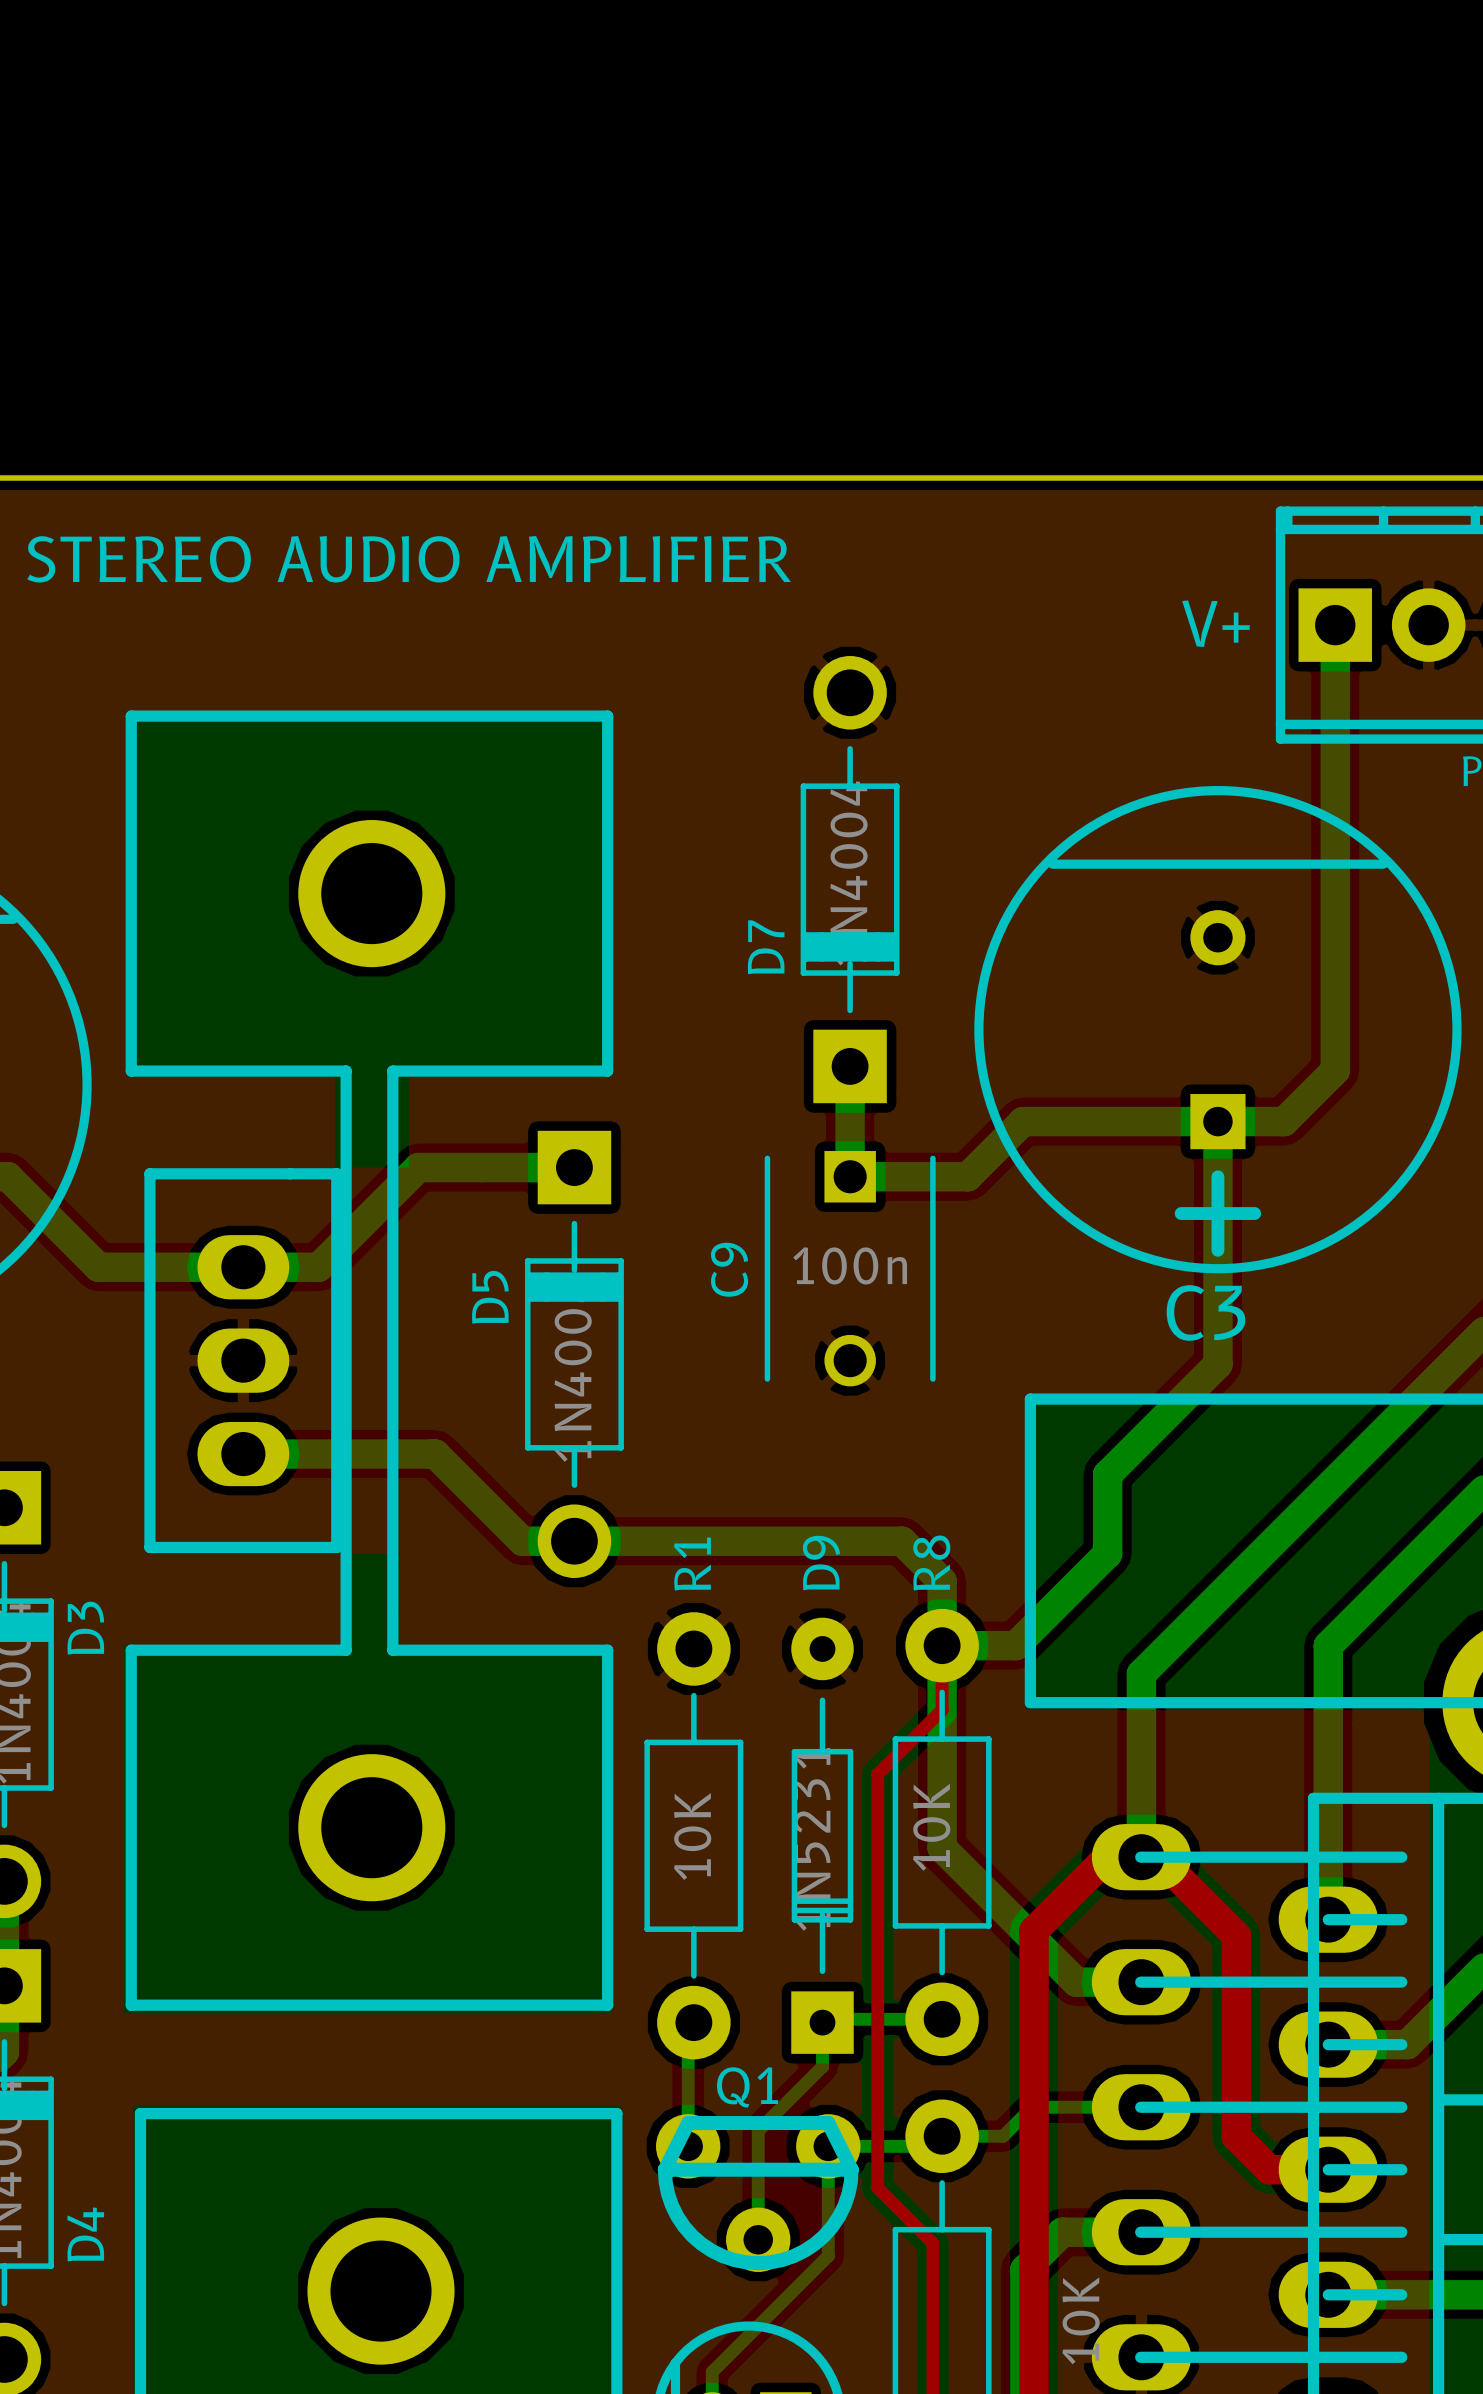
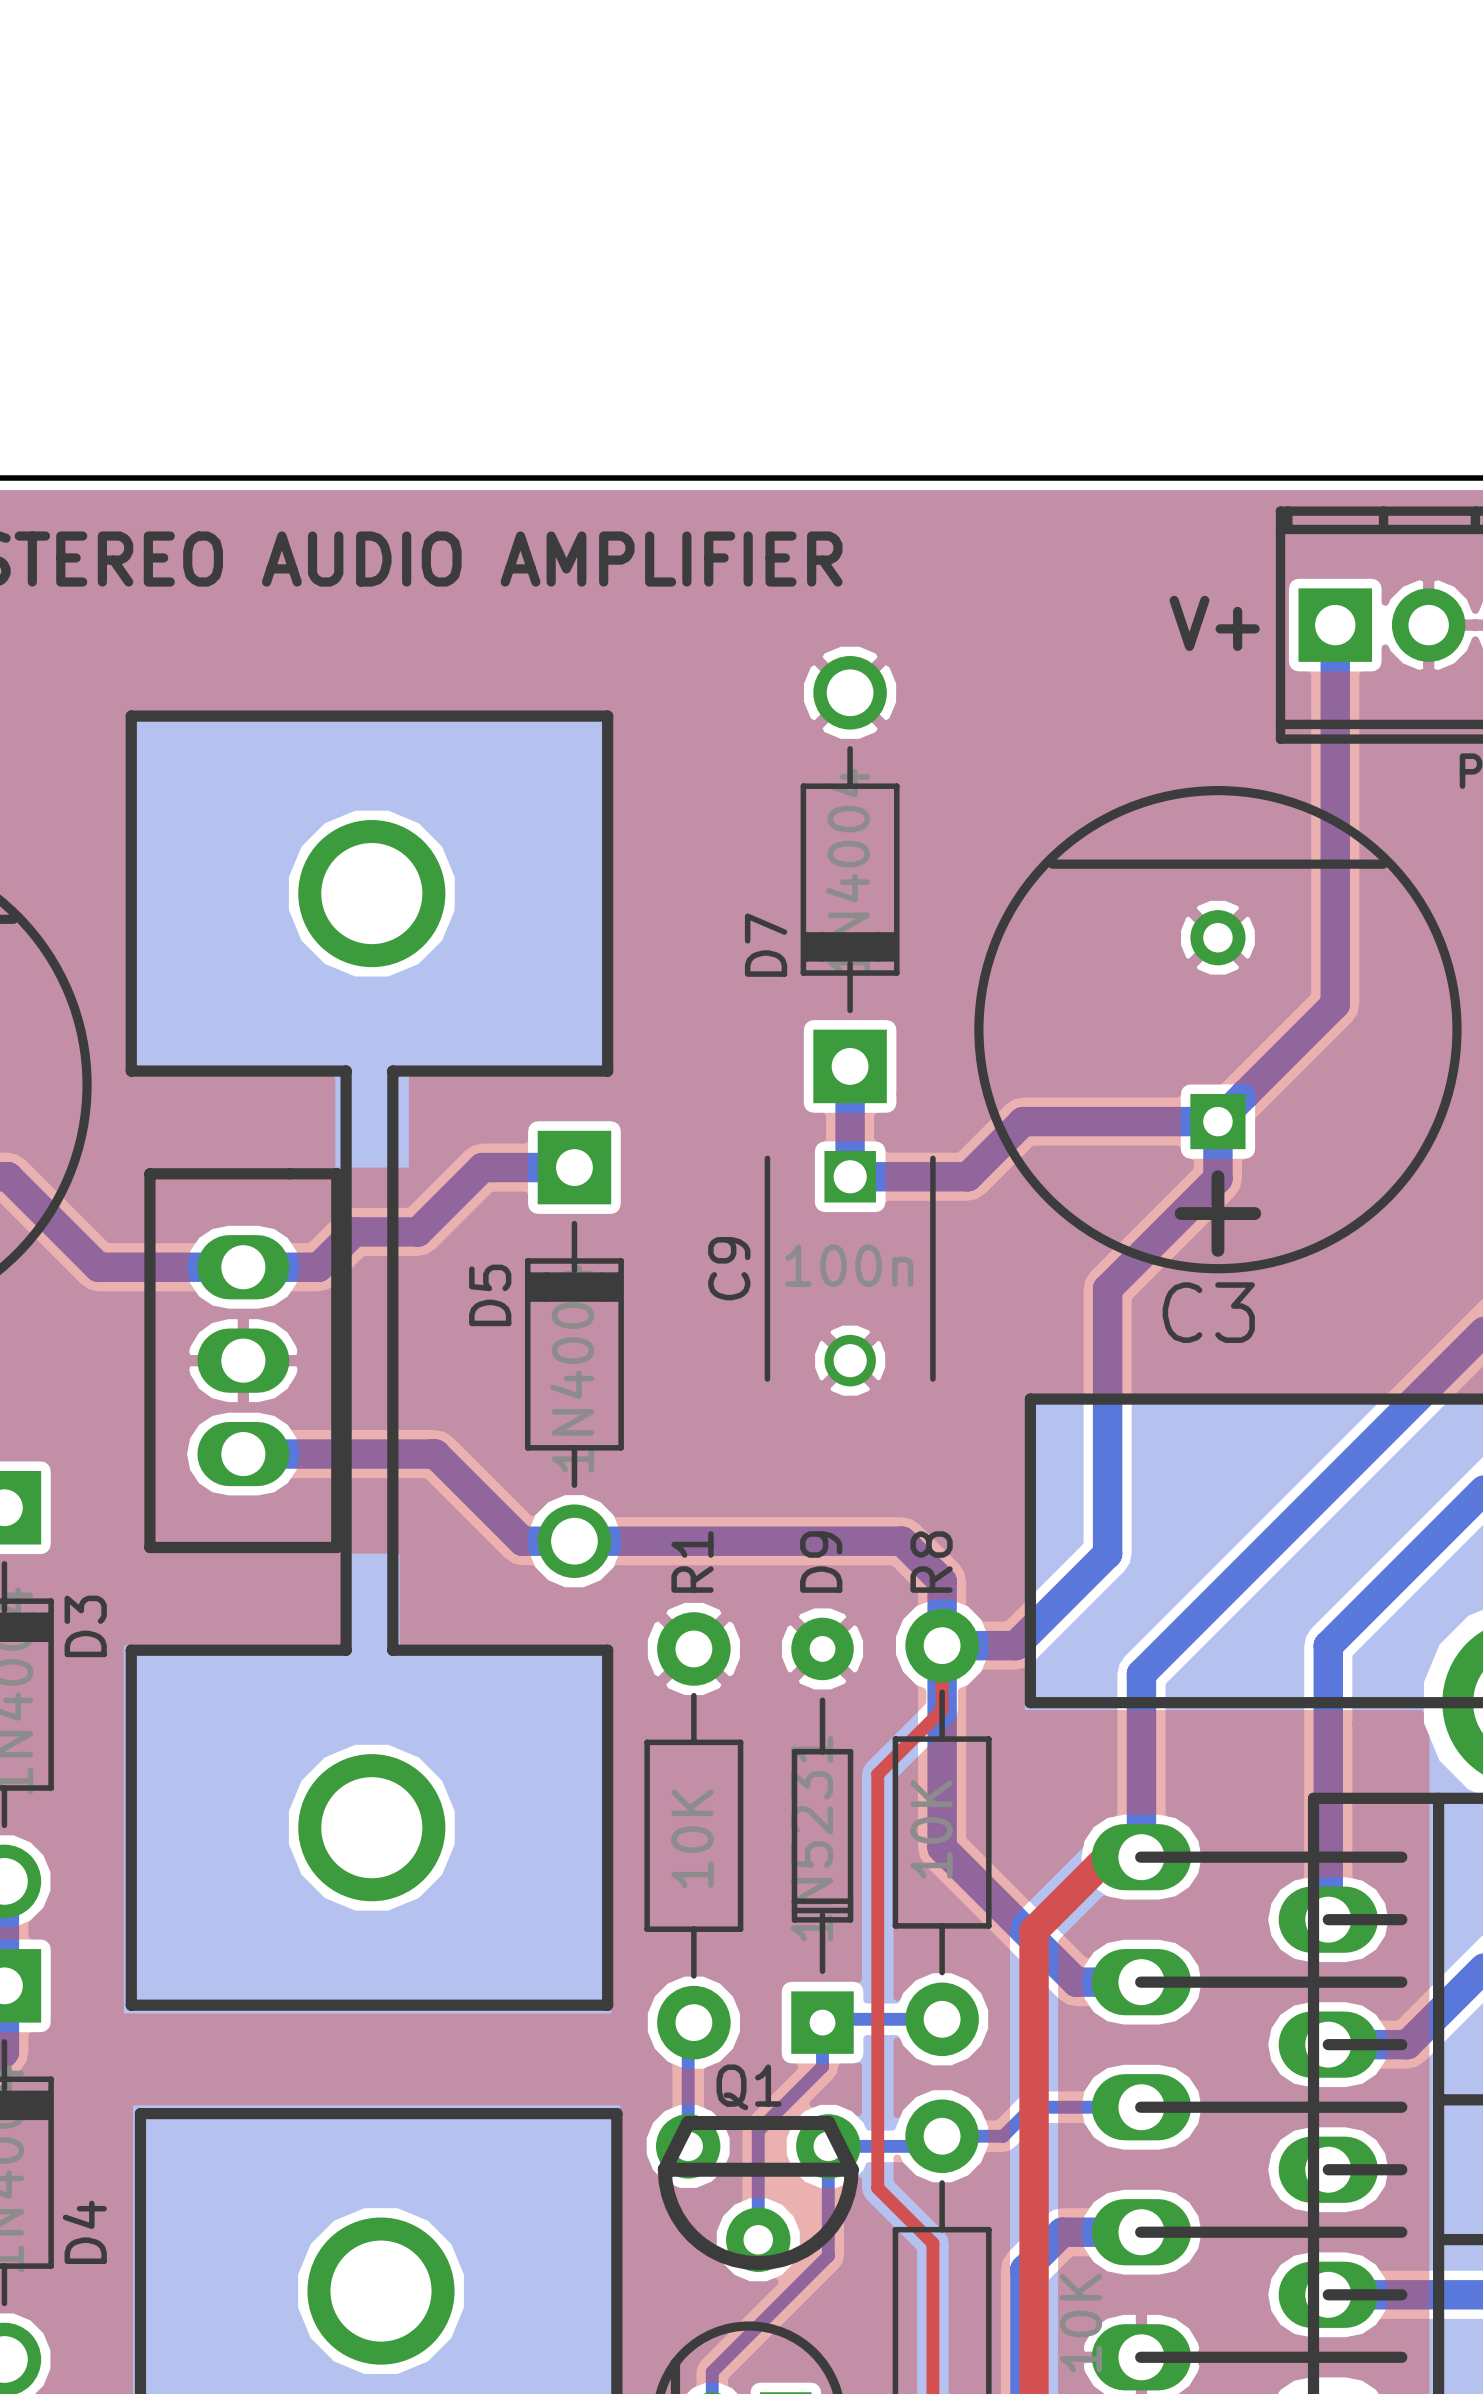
bottom track: (1335, 1004) (1335, 1070) (1284, 1121) (1217, 1121) -> (1335, 1004) (1217, 1121)
bottom track: (482, 1167) (418, 1167) (354, 1231) -> (482, 1167) (418, 1231) (354, 1231)
bottom track: (1217, 1178) (1217, 1364) (1107, 1474) -> (1217, 1178) (1107, 1288) (1107, 1474)
top track: (1141, 1857) (1157, 1857) (1236, 1935) (1236, 2136) (1269, 2169) (1328, 2169) -> none

